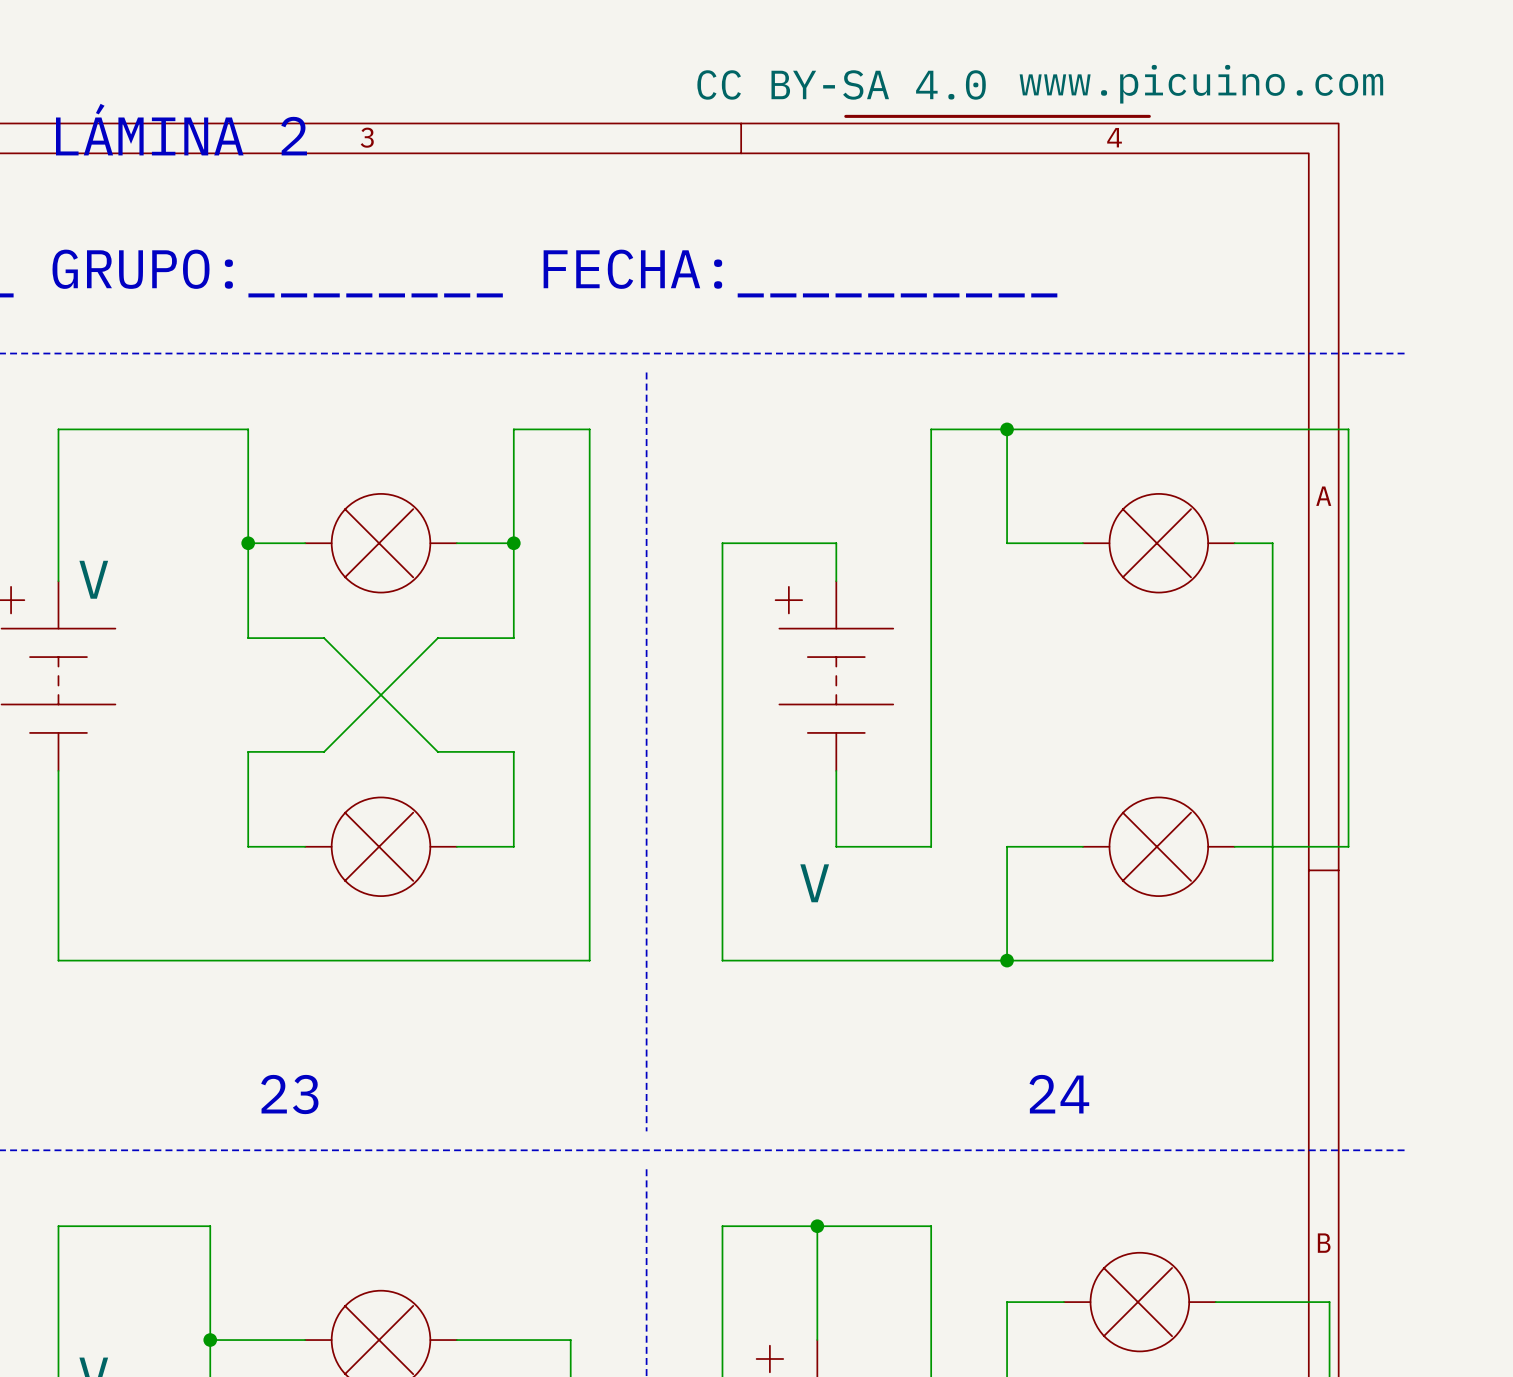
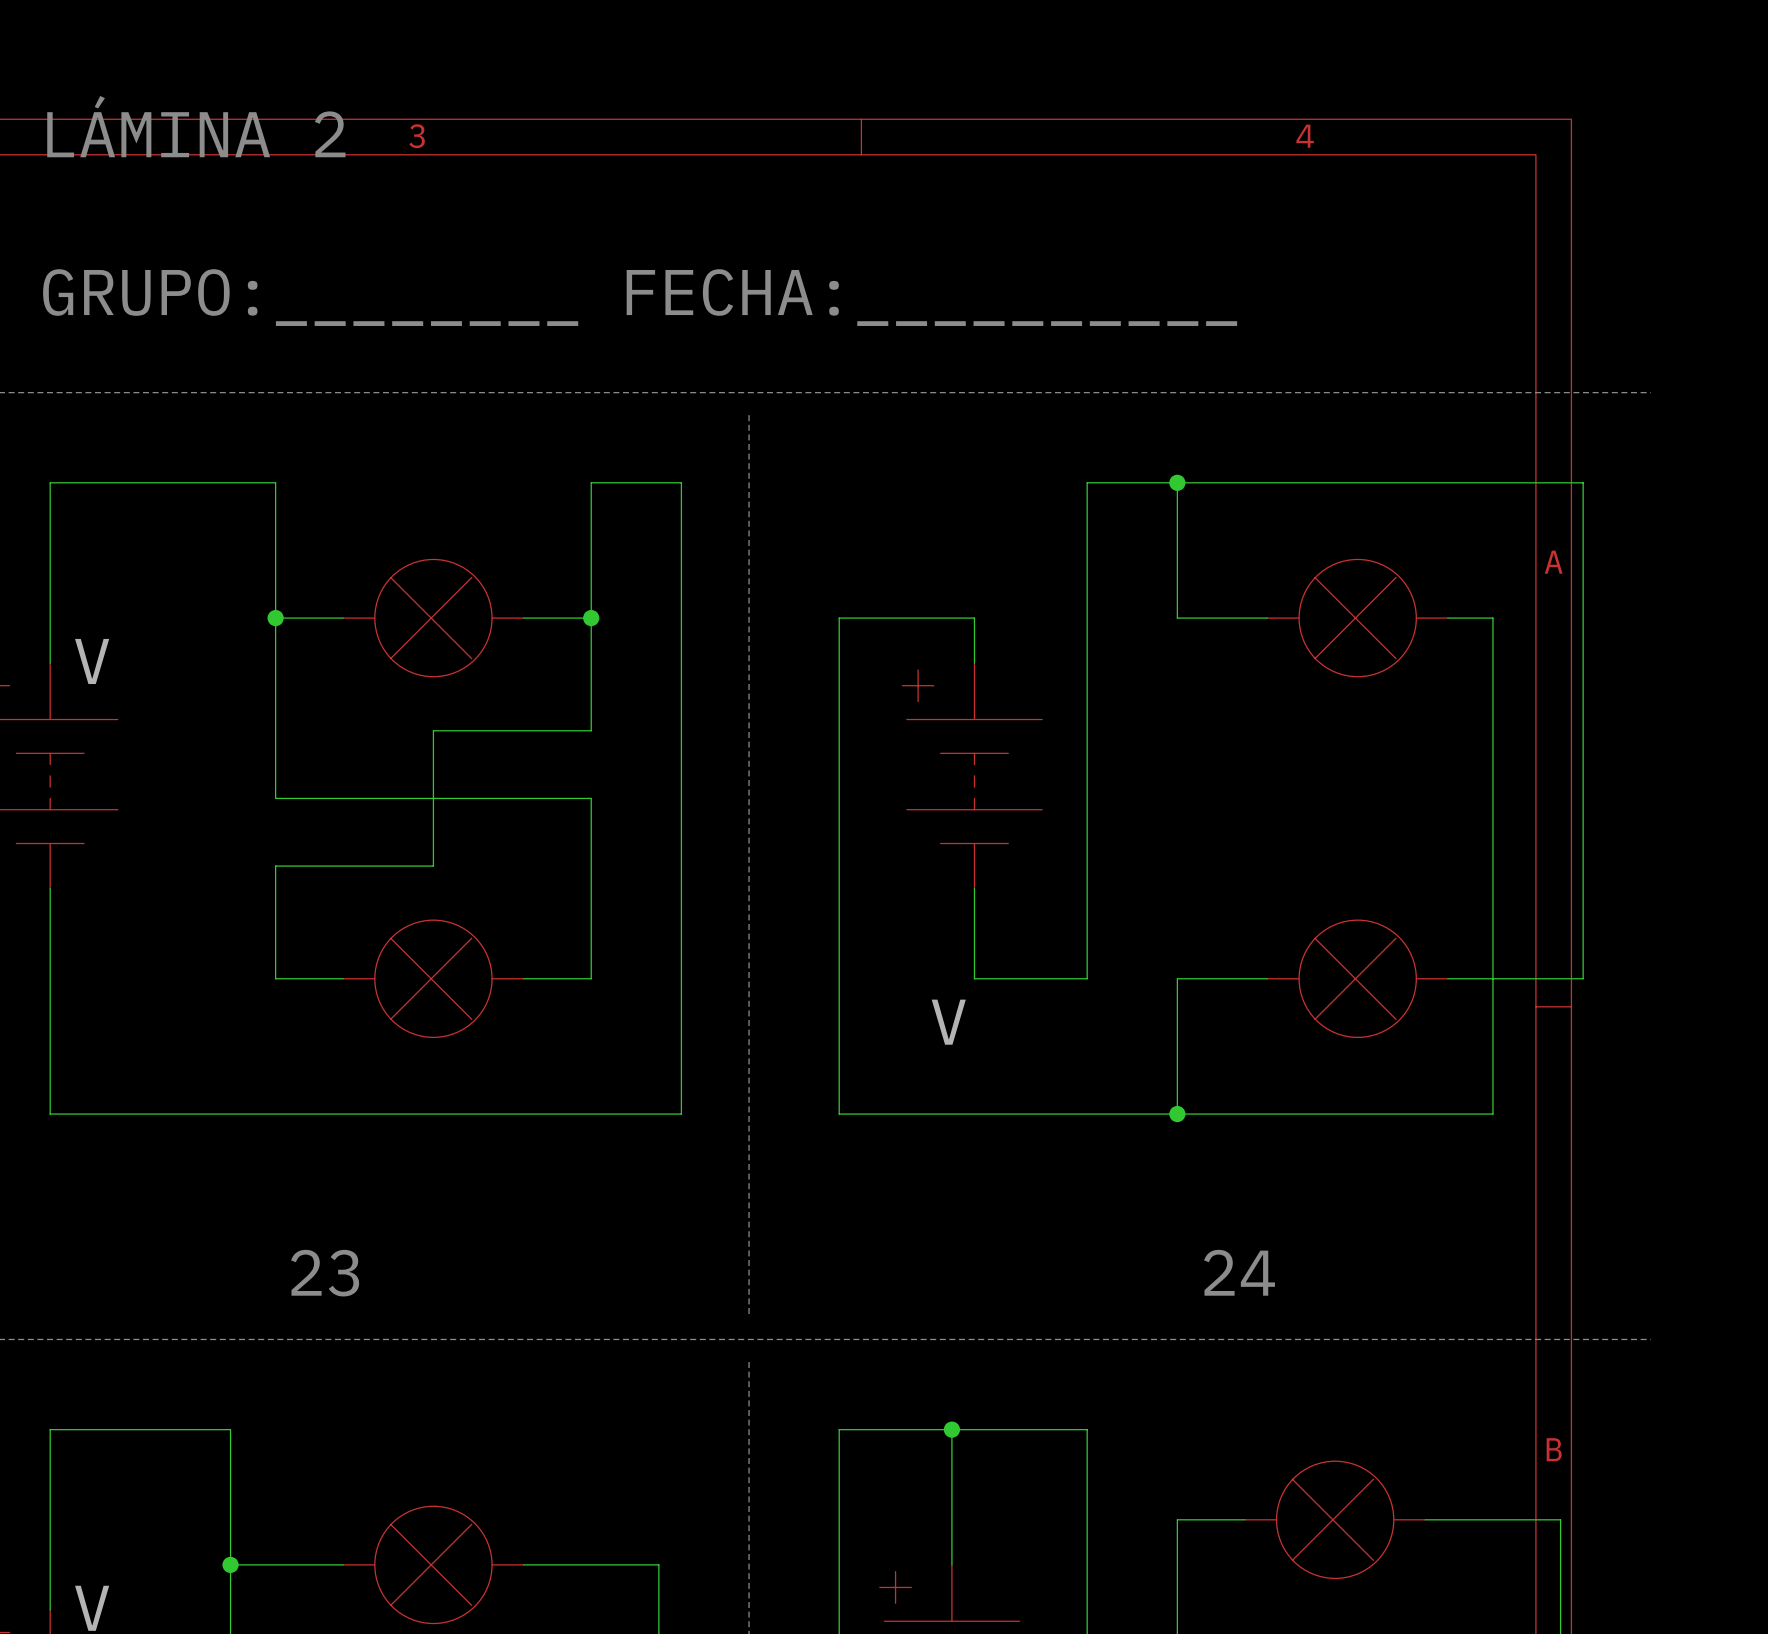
part: (997, 116) -> none
wire: (248, 638) (324, 638) (437, 751) (513, 751) -> (275, 730) (275, 798) (591, 798) (591, 866)
wire: (437, 638) (324, 751) -> (501, 730) (433, 730) (433, 866) (365, 866)

